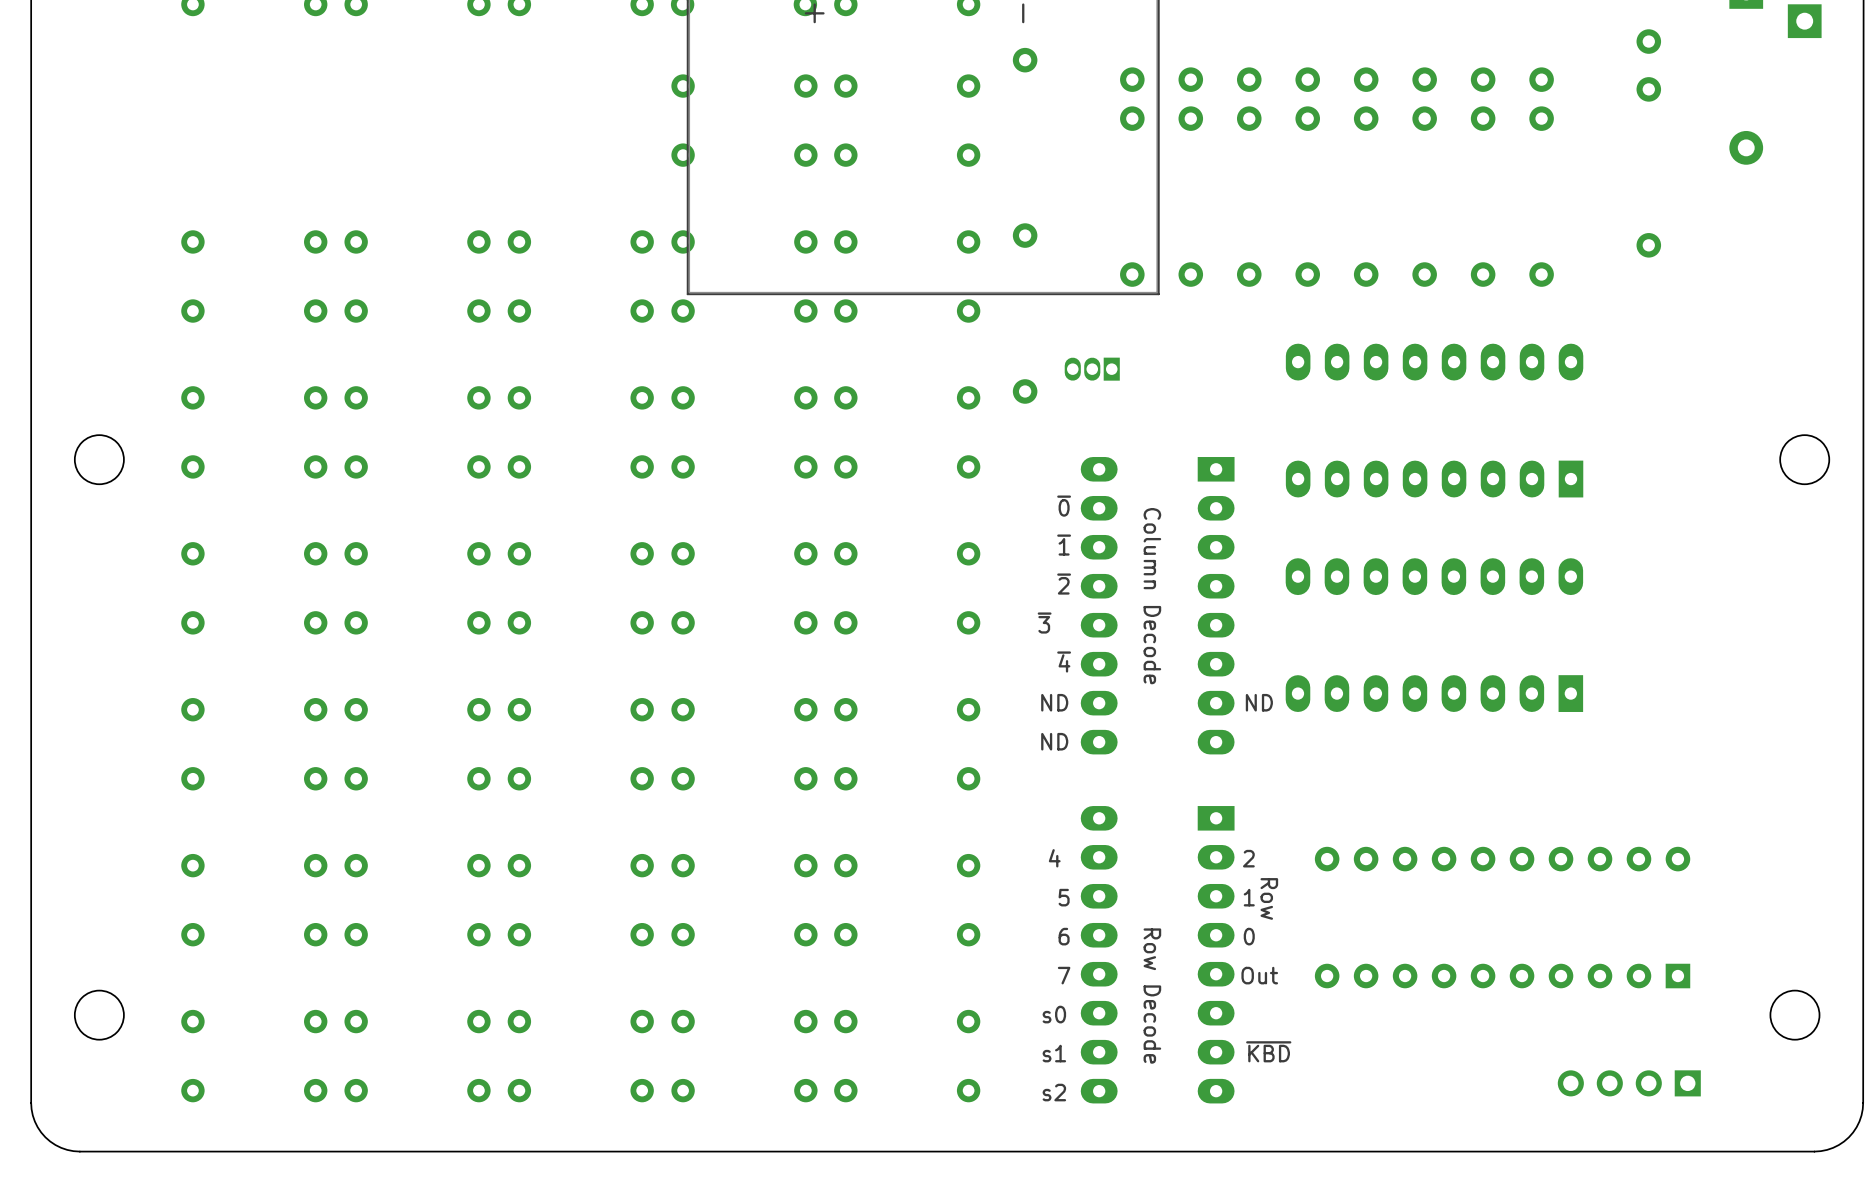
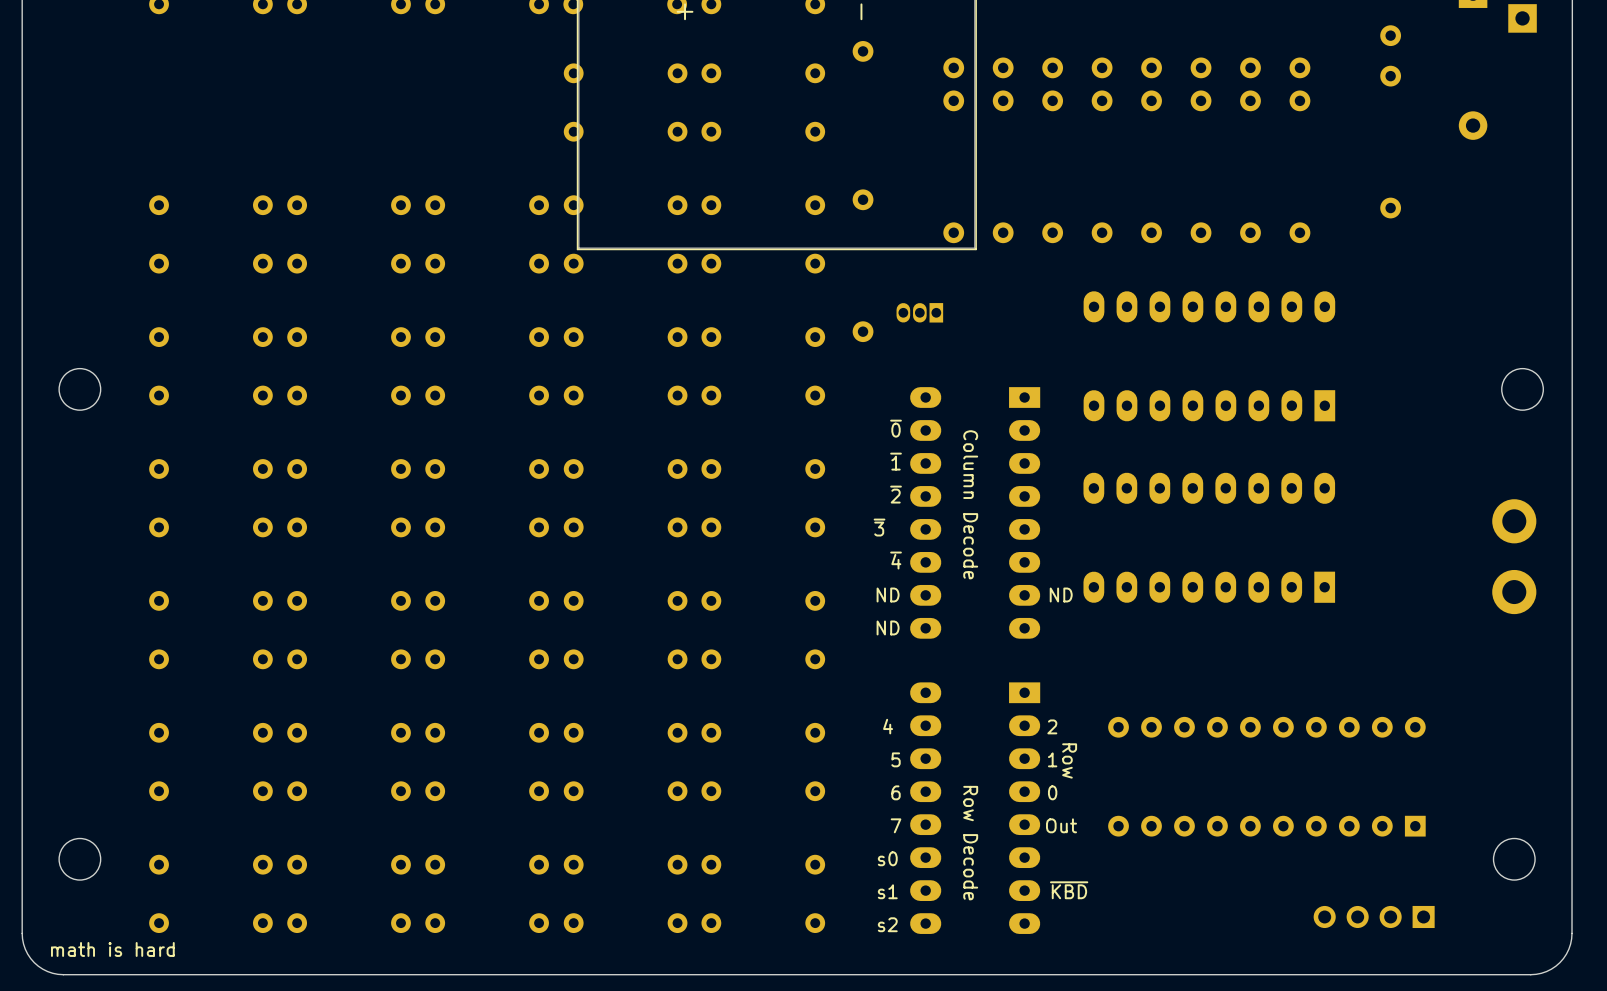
part: none -> (1514, 521)
part: none -> (1514, 592)
text: none -> math is hard (112, 949)

